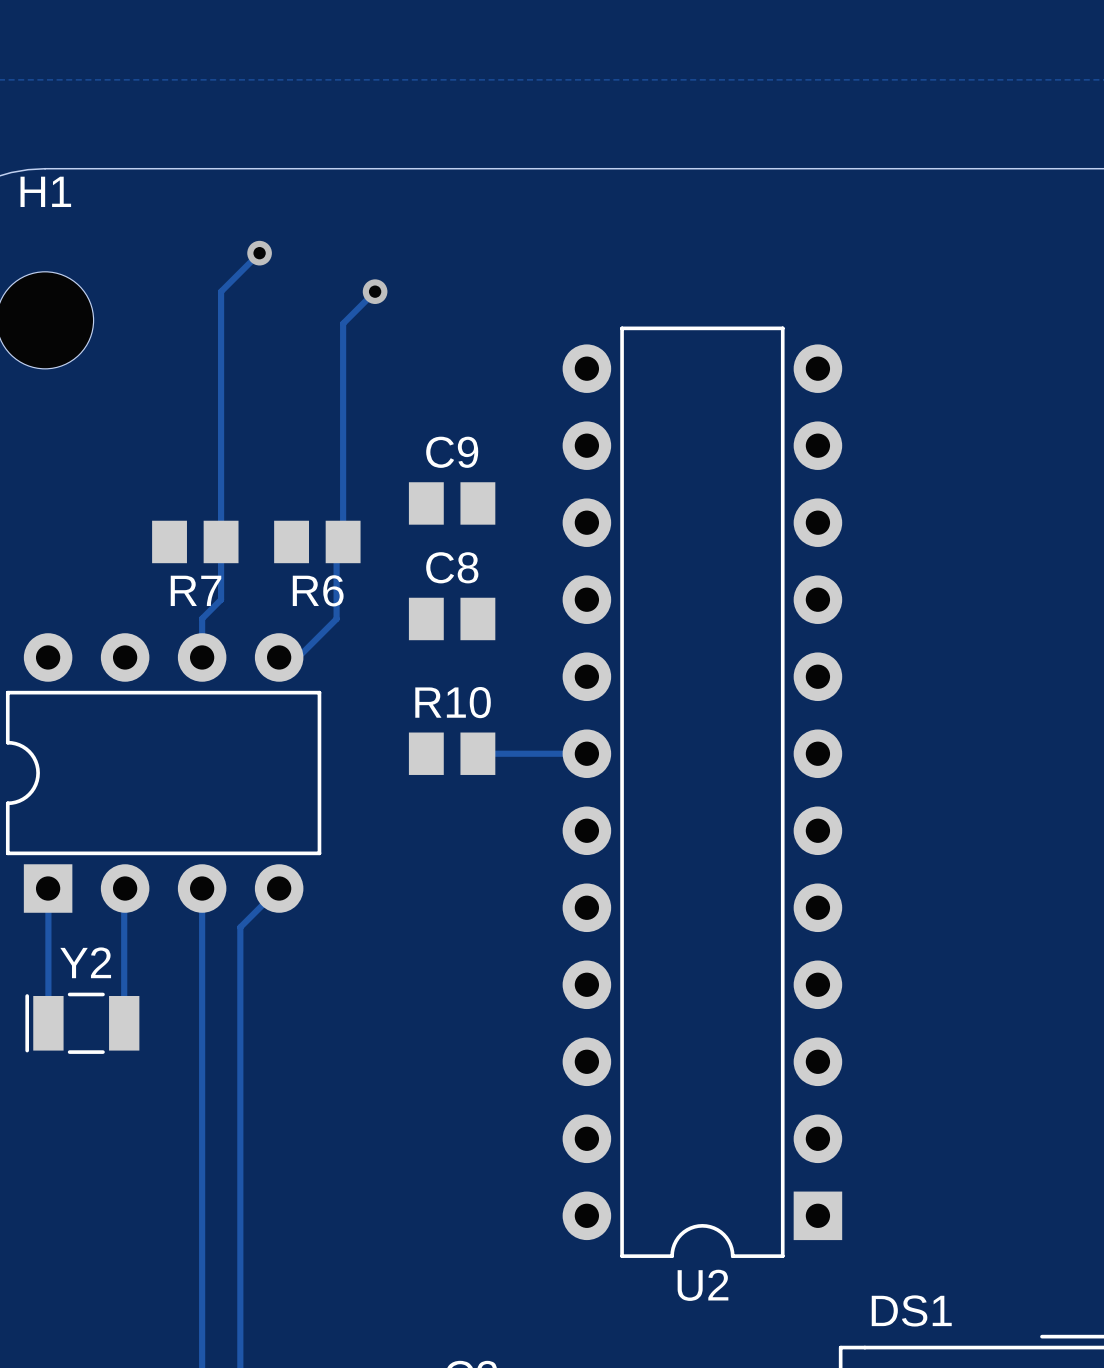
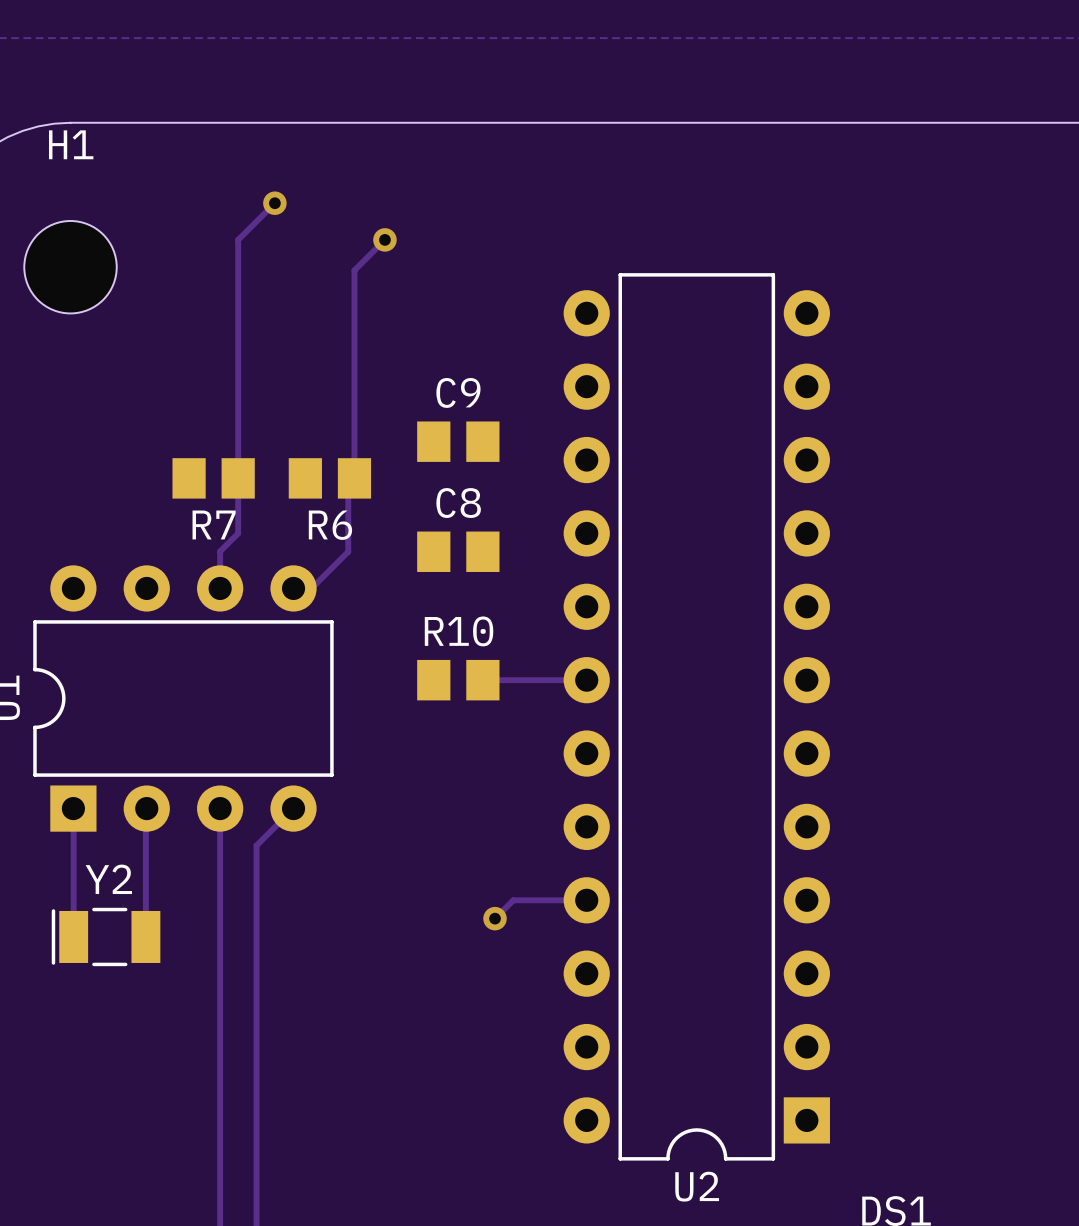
track: none -> (586, 900) (513, 900) (495, 918)
via: none -> (495, 918)

